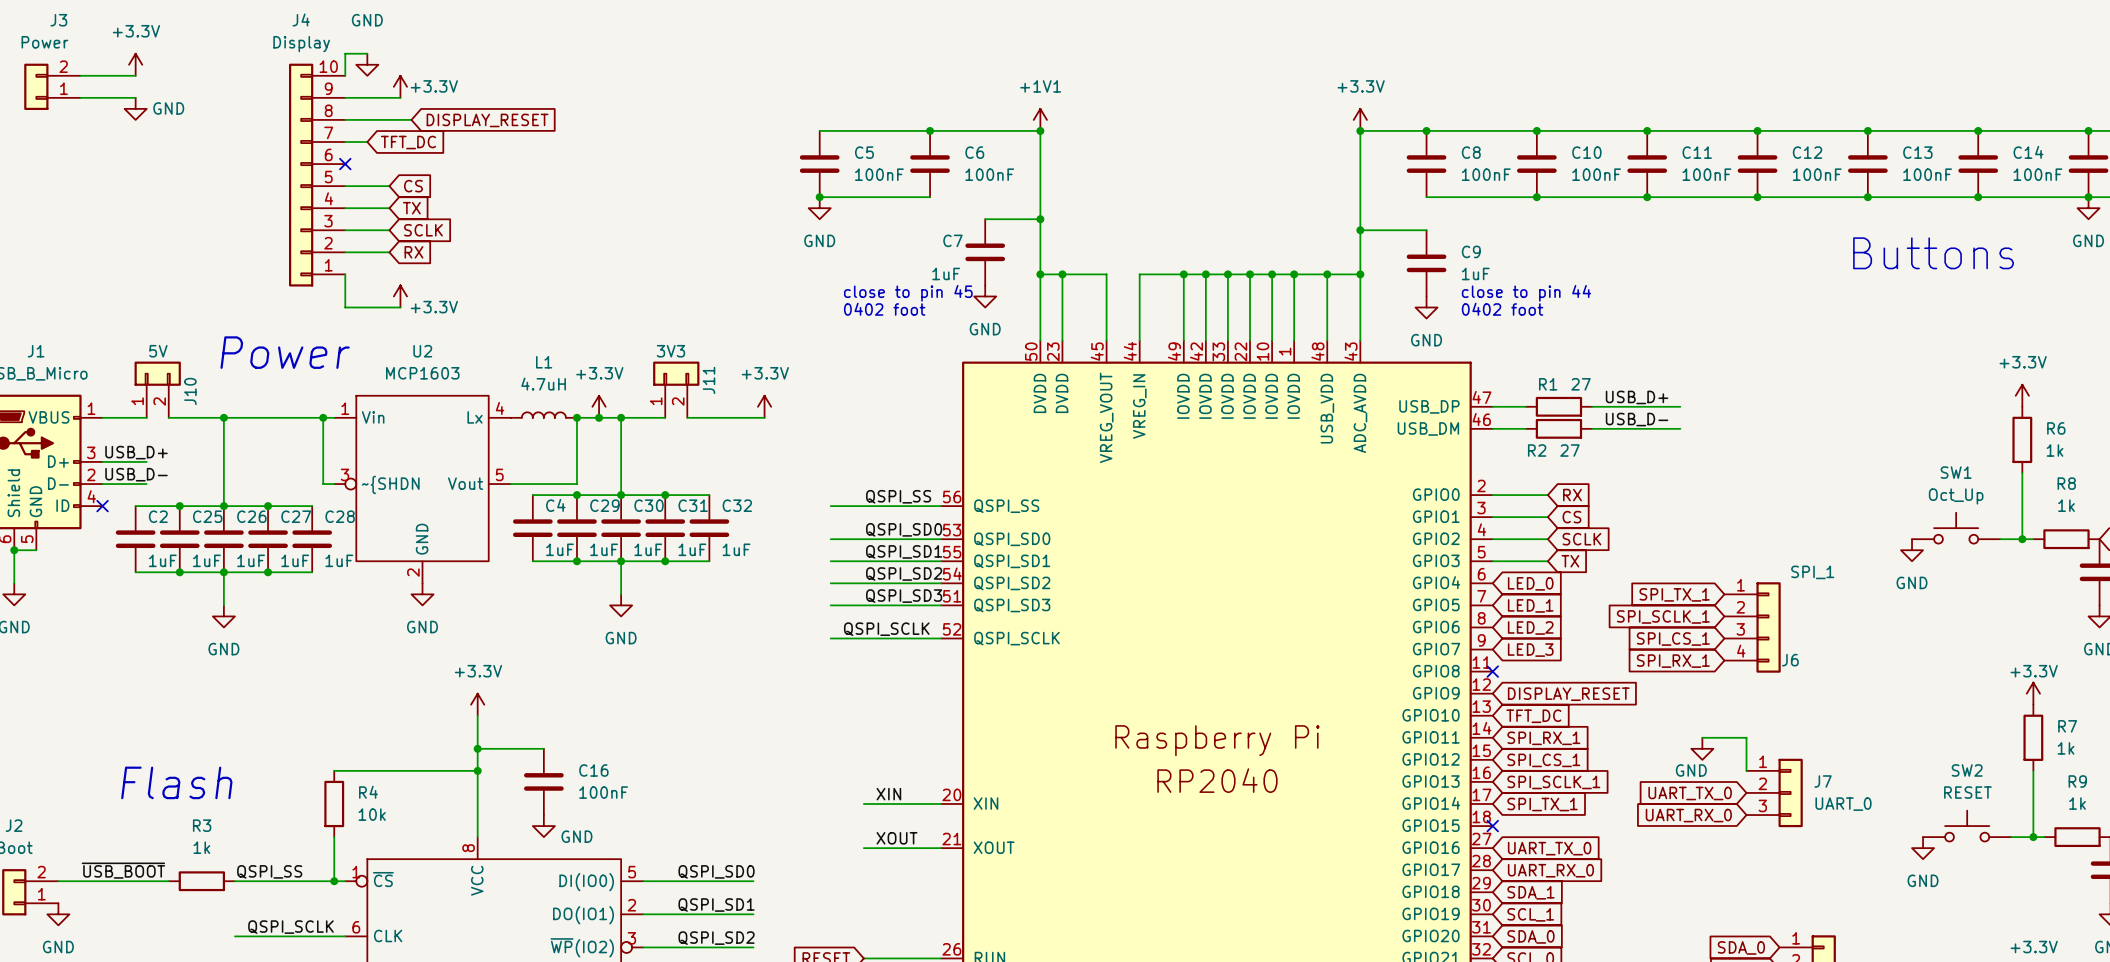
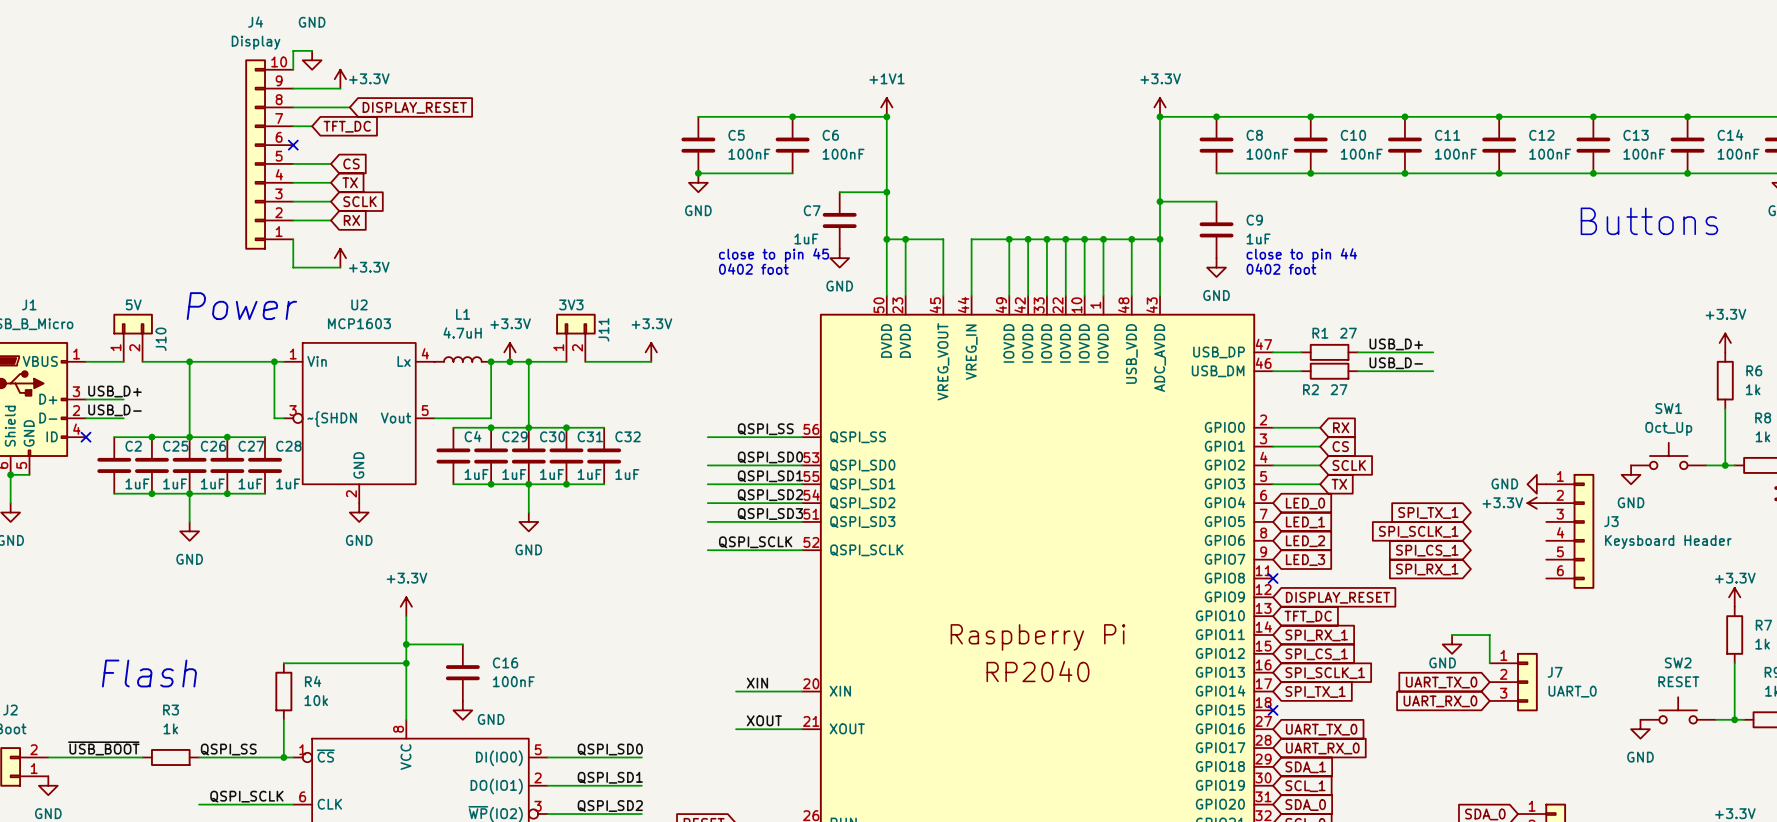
J3 name position: J3 (58, 20) -> J3 (1611, 521)
J3 value: Power (44, 42) -> Keysboard Header (1668, 542)
J3 symbol: [24, 63, 81, 111] -> [1546, 473, 1595, 589]
power symbol: +3.3V (135, 64) -> none
wire: (80, 75) (135, 75) -> none
wire: (80, 97) (135, 97) -> none
power symbol: GND (135, 108) -> none
power symbol: none -> GND (1536, 484)
power symbol: none -> +3.3V (1536, 503)
J6: SPI_1 (1752, 627) -> none

